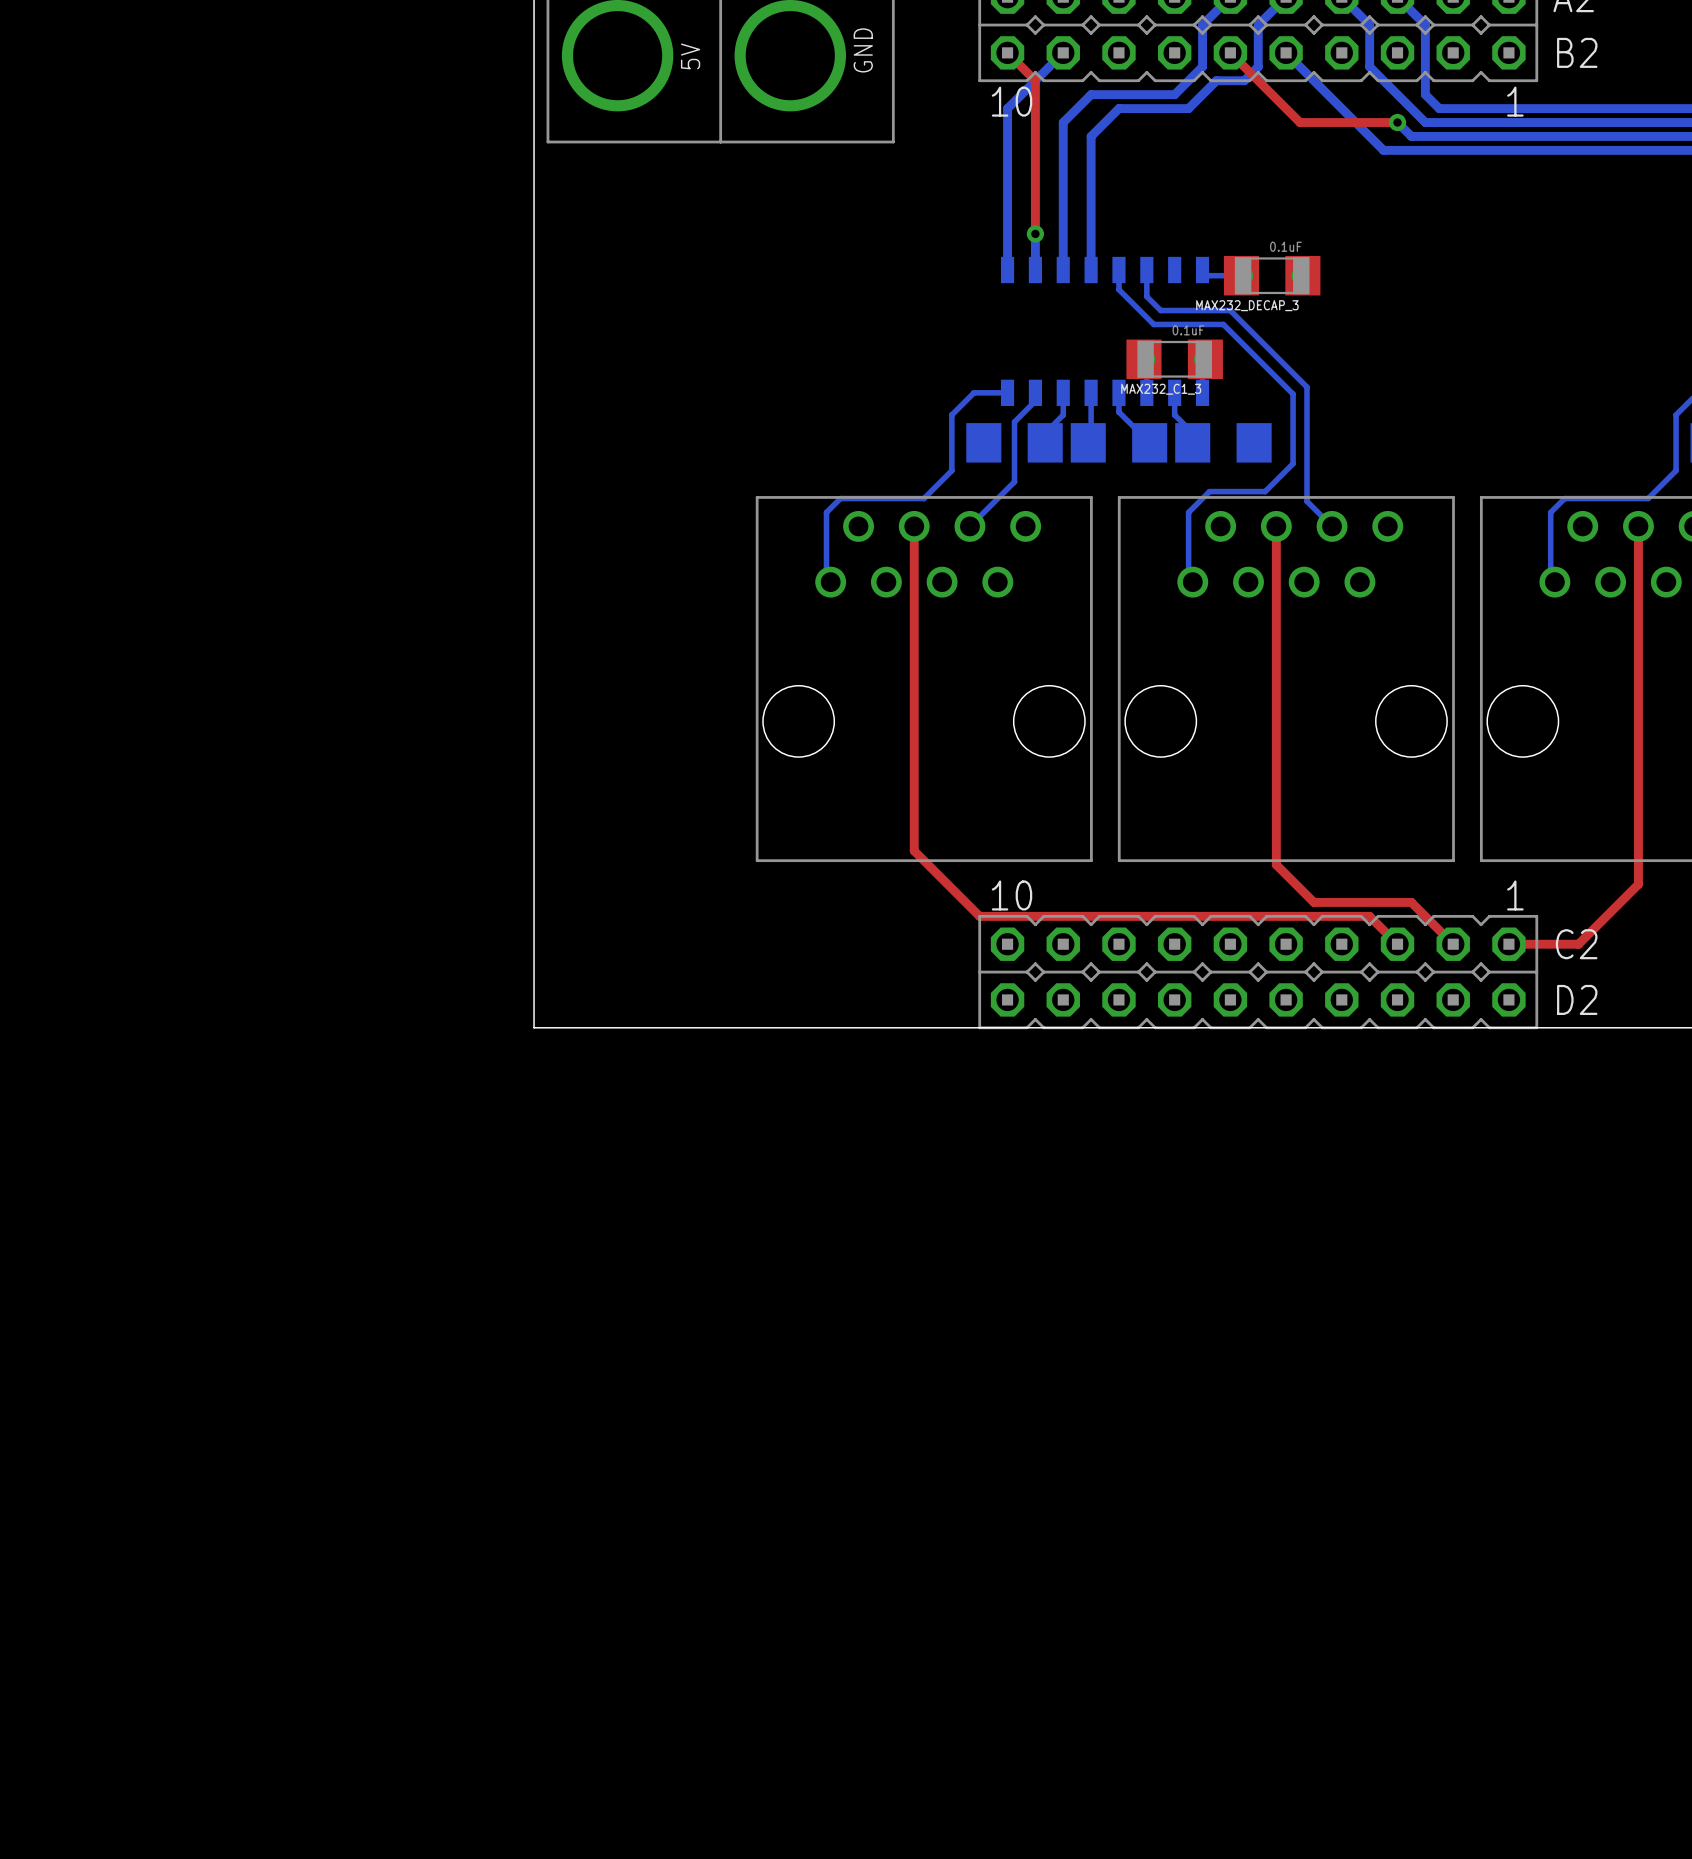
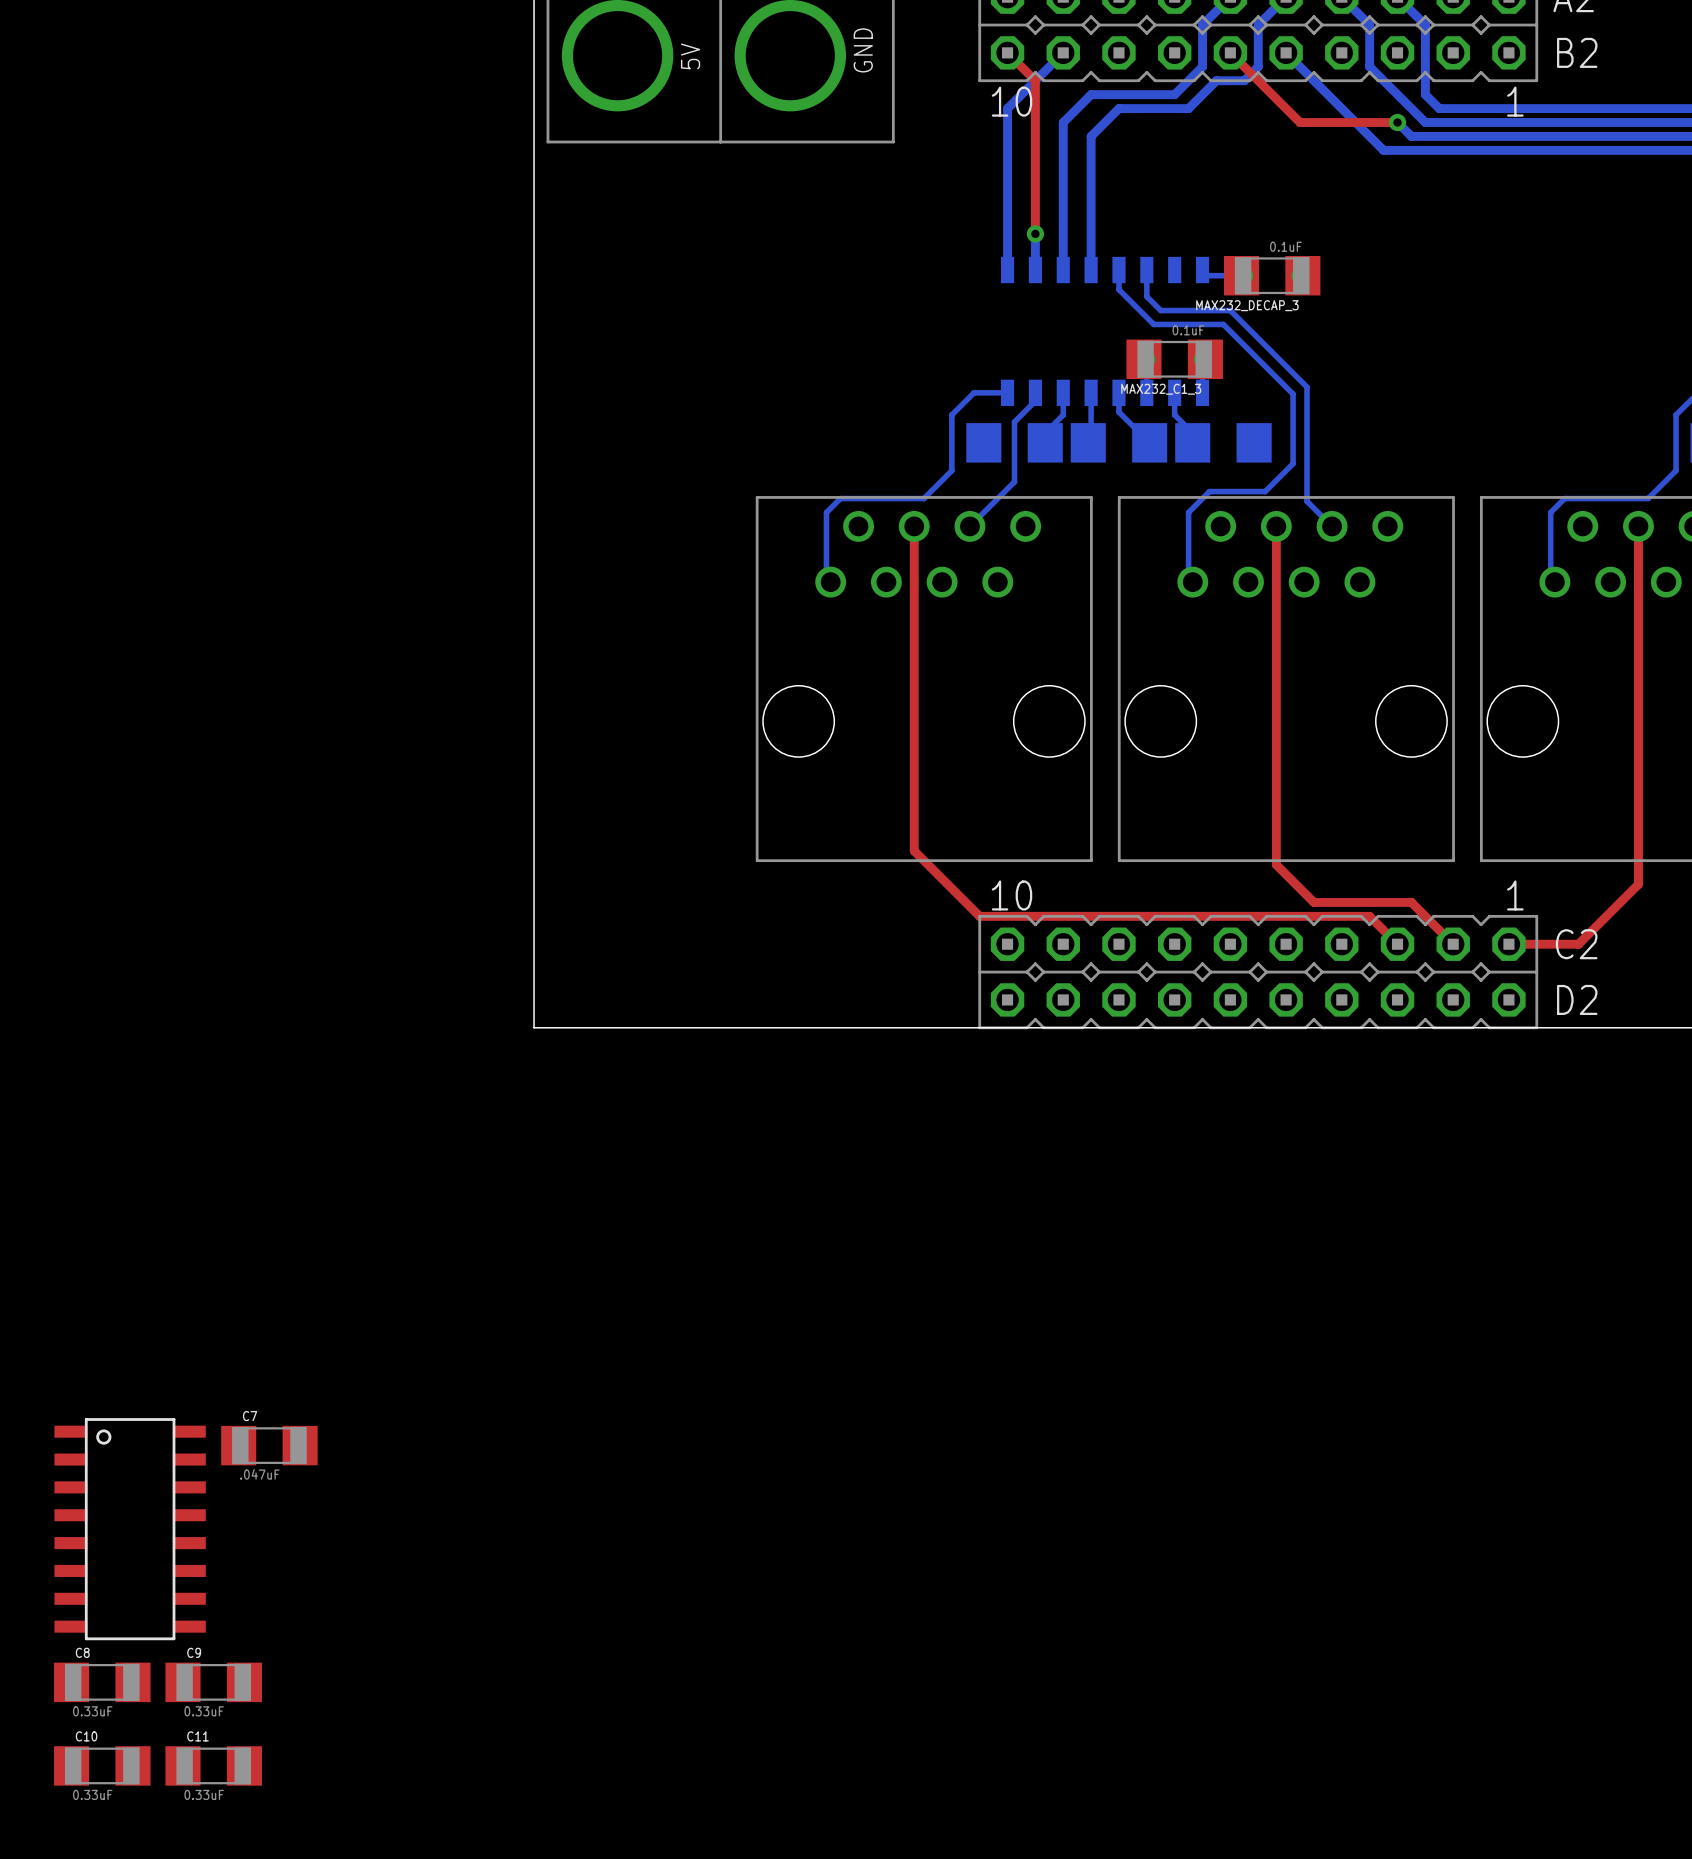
C7: none -> .047uF (269, 1445)
part: none -> (130, 1529)
C8: none -> 0.33uF (102, 1682)
C9: none -> 0.33uF (213, 1682)
C10: none -> 0.33uF (102, 1765)
C11: none -> 0.33uF (213, 1765)

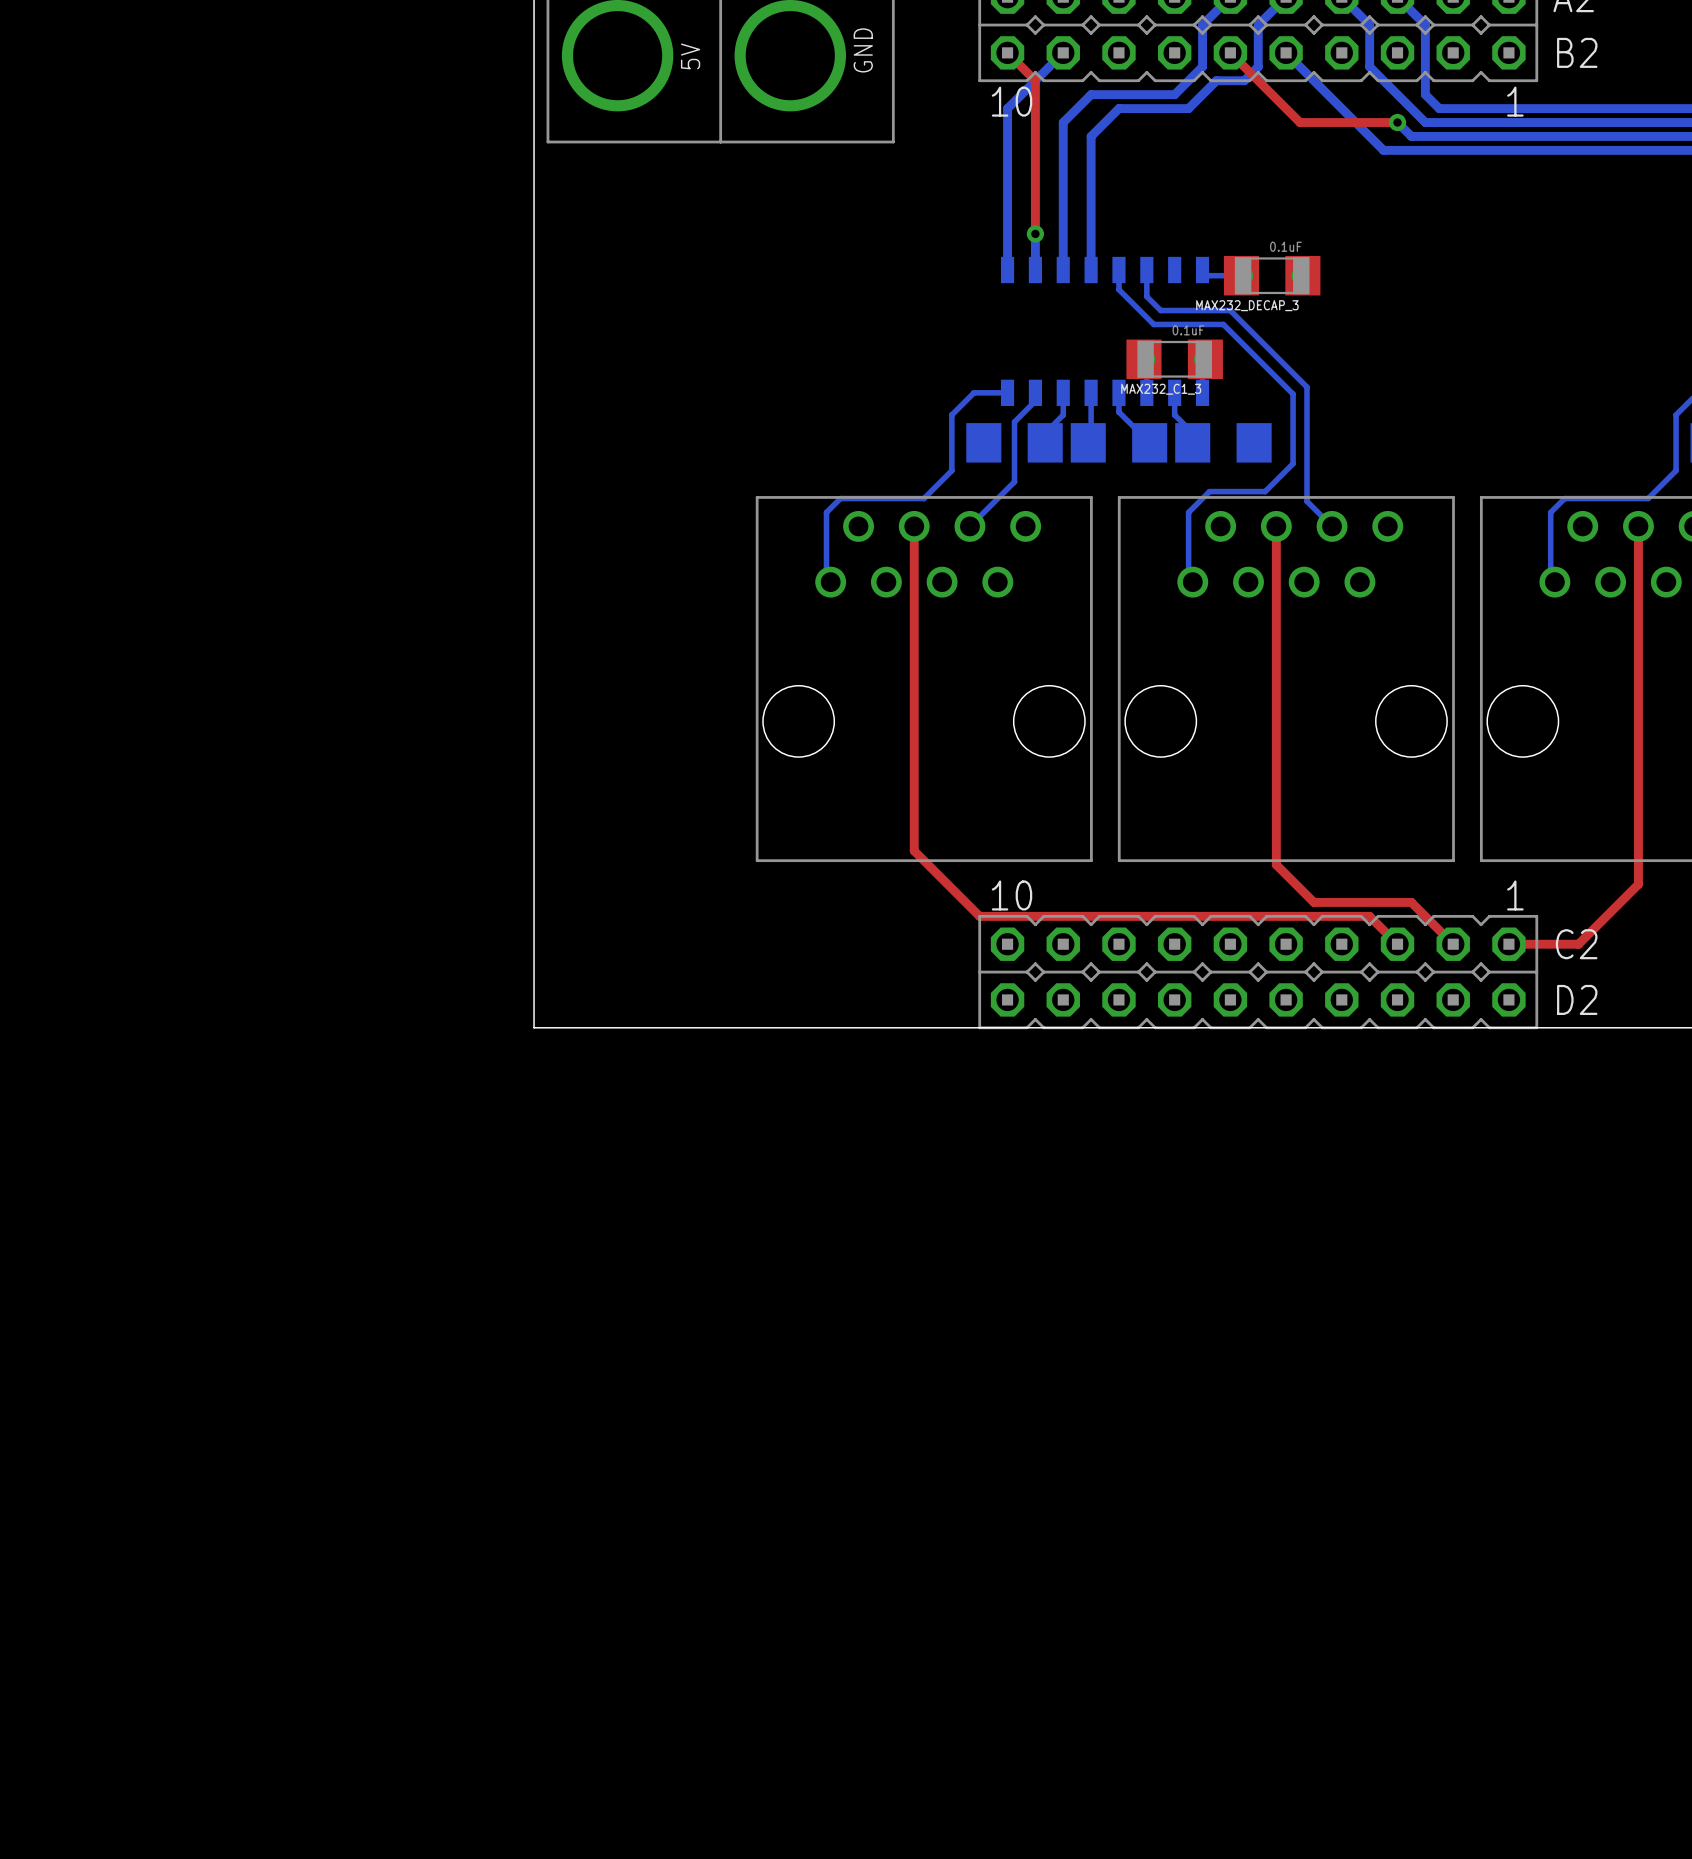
C7: .047uF (269, 1445) -> none
part: (130, 1529) -> none
C8: 0.33uF (102, 1682) -> none
C9: 0.33uF (213, 1682) -> none
C10: 0.33uF (102, 1765) -> none
C11: 0.33uF (213, 1765) -> none

